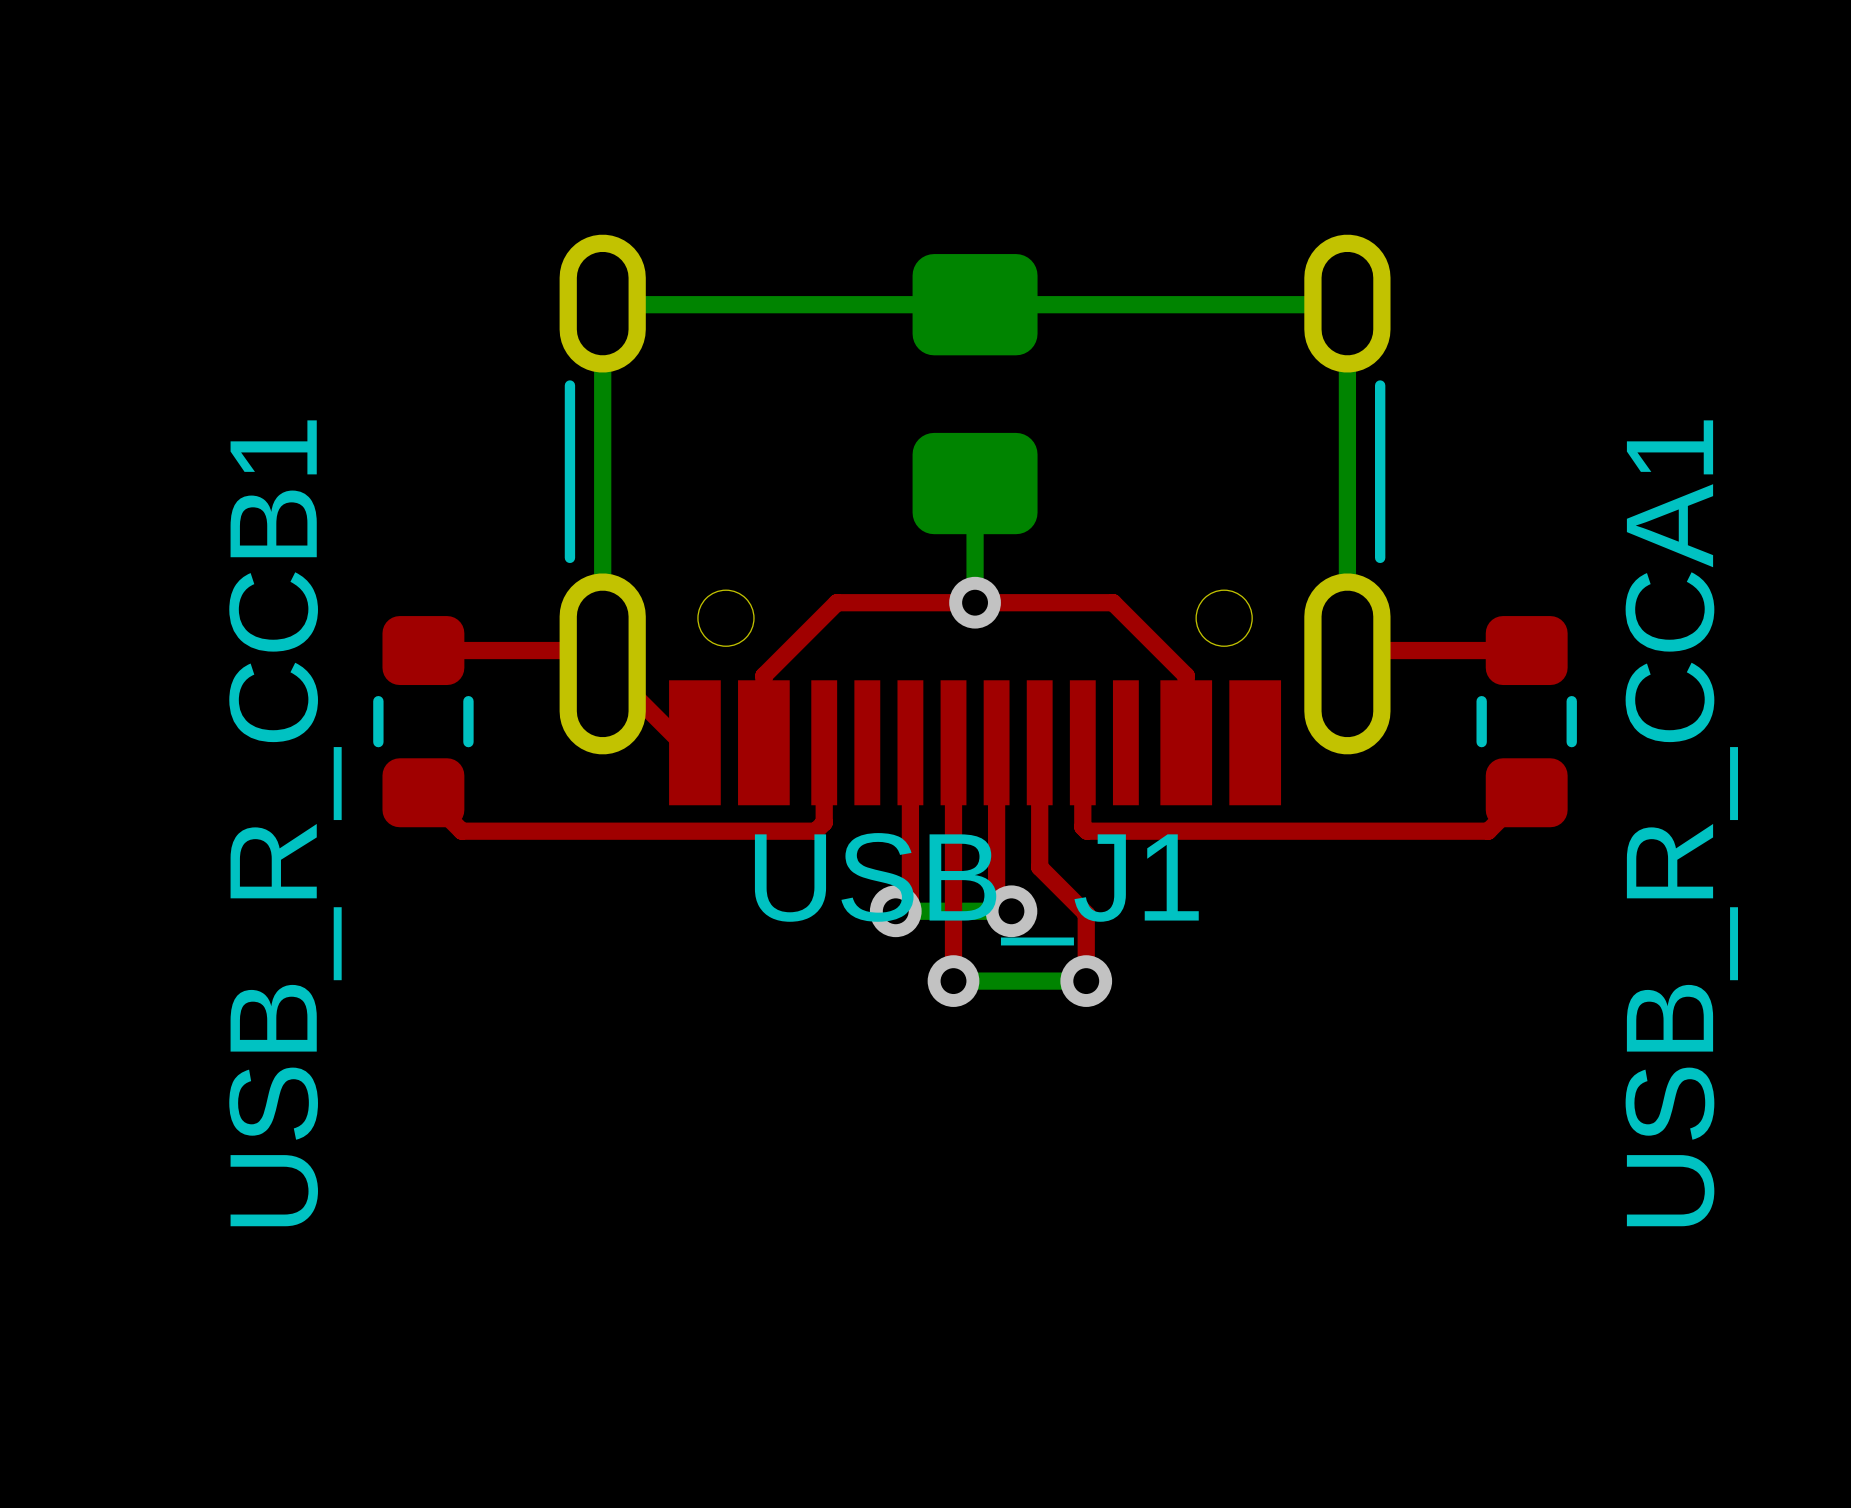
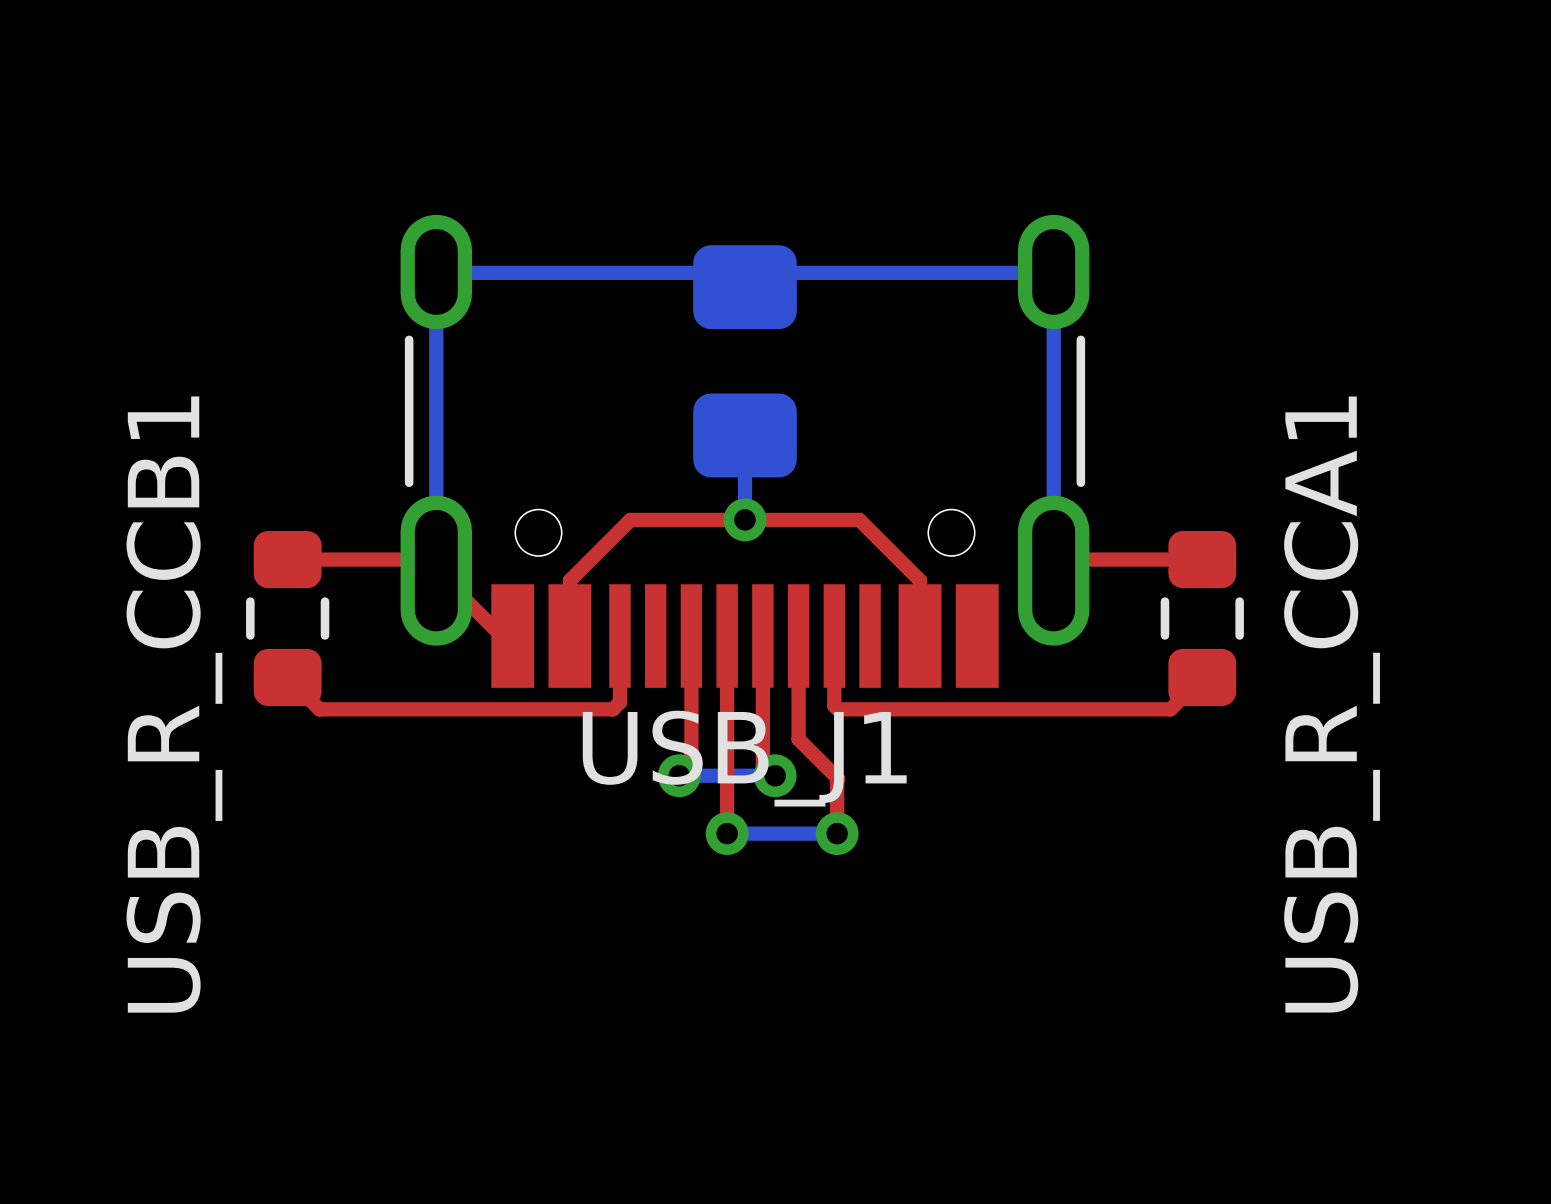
part position: (975, 394) -> (744, 361)

